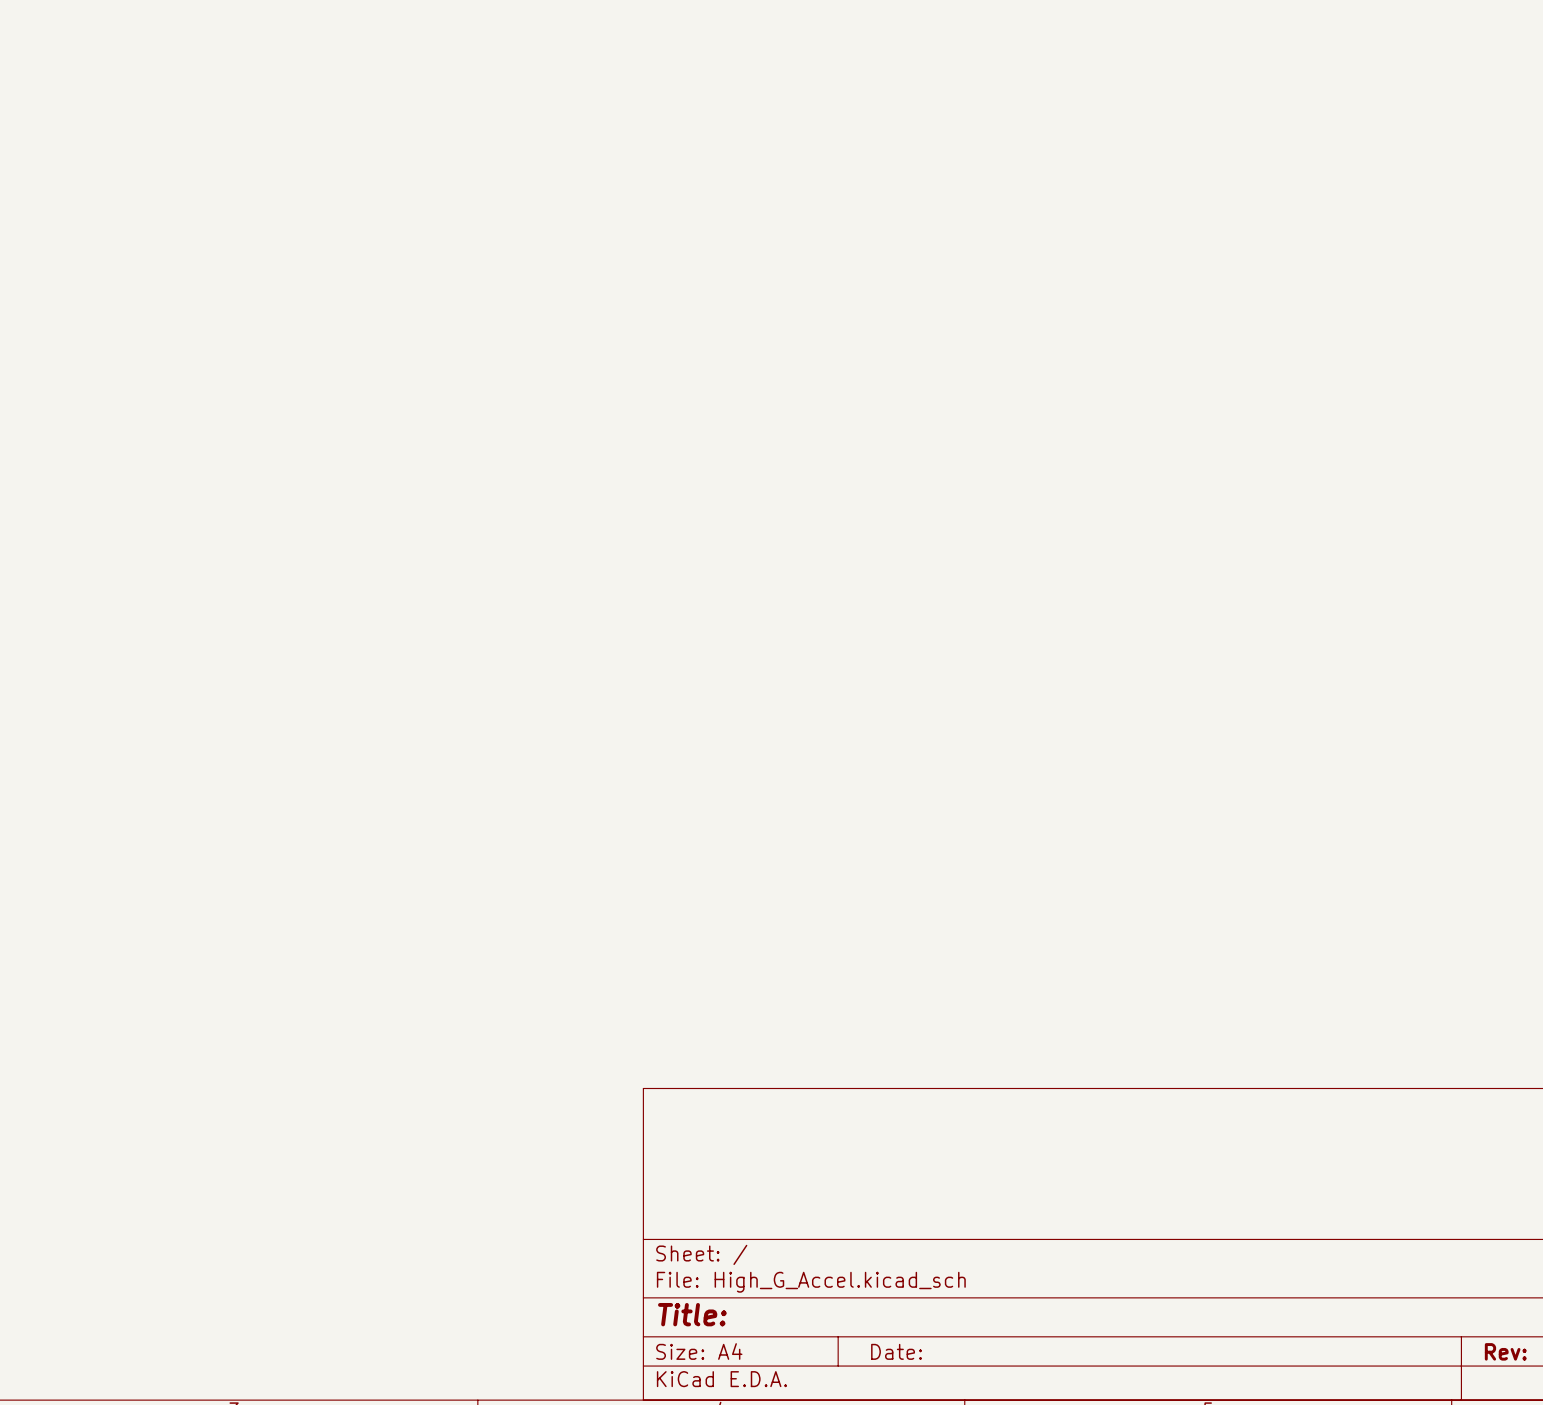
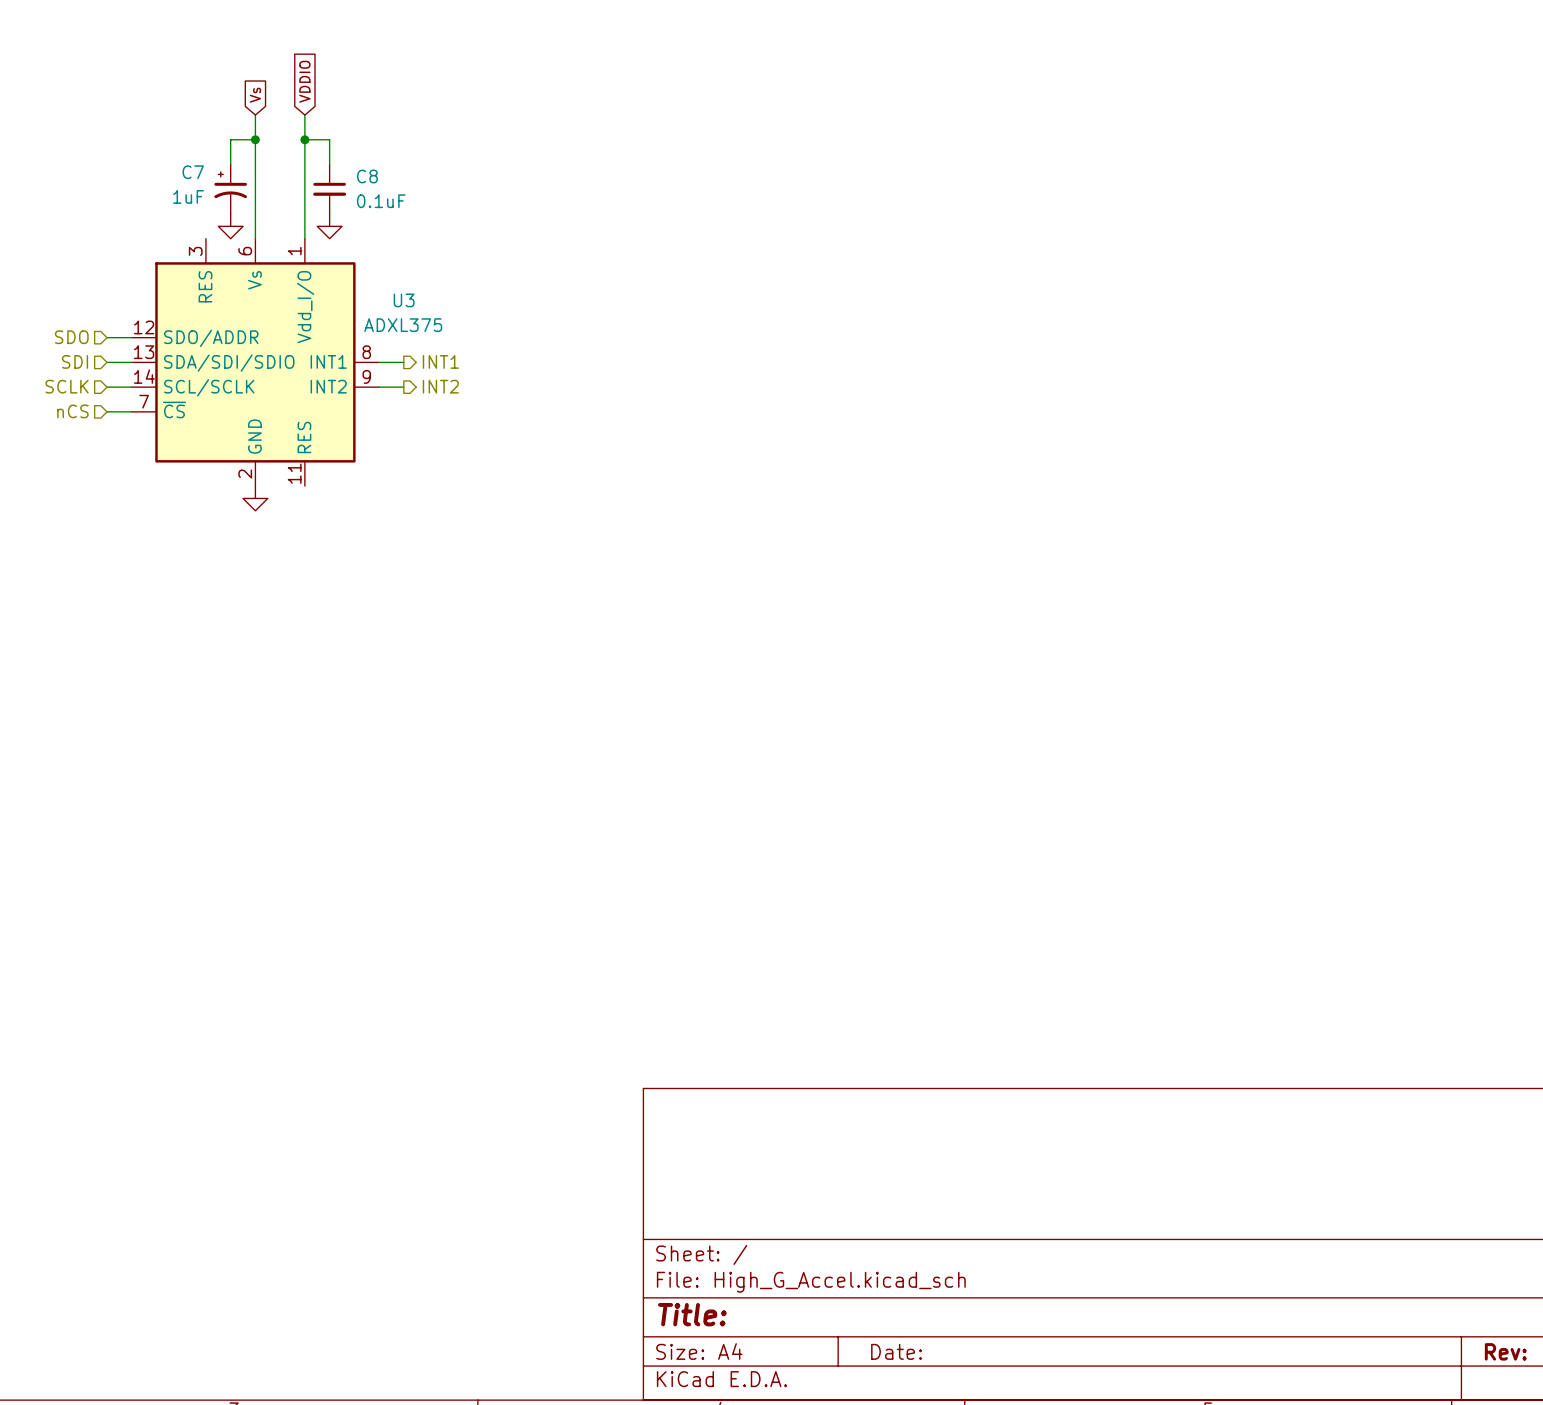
global label: none -> VDDIO (304, 81)
global label: none -> Vs (255, 95)
wire: none -> (255, 115) (255, 238)
wire: none -> (304, 115) (304, 238)
wire: none -> (255, 139) (230, 139) (230, 164)
junction: none -> (255, 139)
wire: none -> (304, 139) (329, 139) (329, 164)
junction: none -> (304, 139)
C7: none -> 1uF (230, 189)
C8: none -> 0.1uF (329, 189)
power symbol: none -> (230, 226)
power symbol: none -> (329, 226)
hierarchical label: none -> SDO (71, 337)
wire: none -> (107, 337) (131, 337)
hierarchical label: none -> SDI (75, 361)
hierarchical label: none -> INT1 (440, 361)
wire: none -> (107, 362) (131, 362)
U3: none -> ADXL375 (255, 362)
wire: none -> (379, 362) (403, 362)
hierarchical label: none -> SCLK (67, 386)
hierarchical label: none -> INT2 (440, 386)
wire: none -> (107, 387) (131, 387)
wire: none -> (379, 387) (403, 387)
hierarchical label: none -> nCS (72, 411)
wire: none -> (107, 411) (131, 411)
power symbol: none -> (255, 498)

